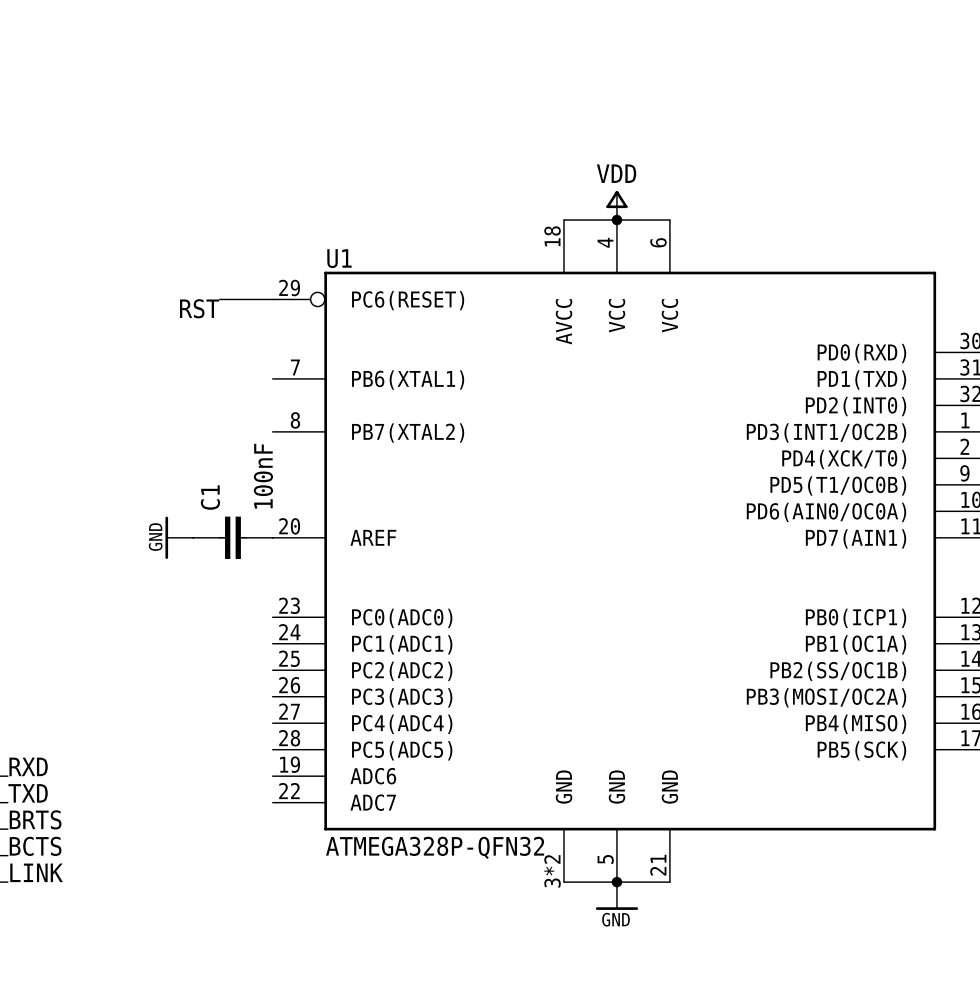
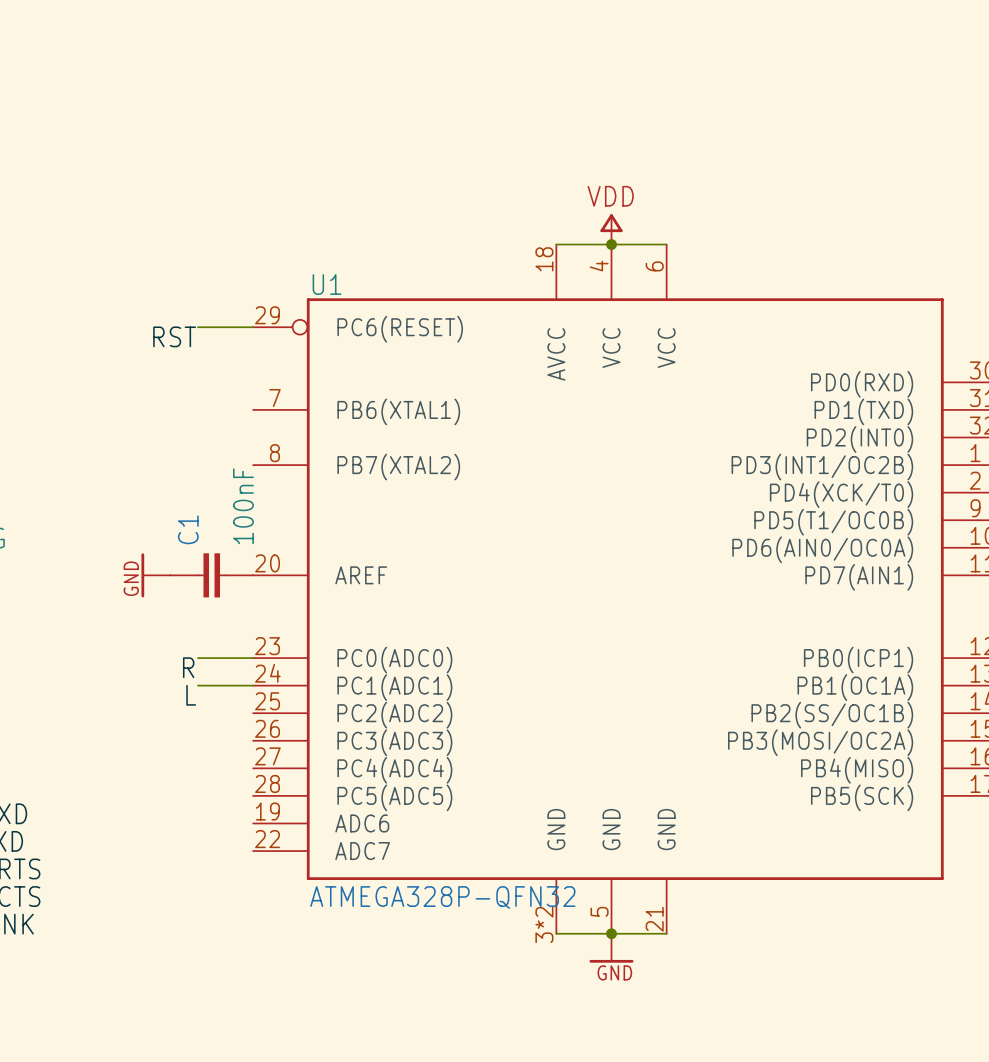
wire: none -> (197, 658) (253, 658)
label: none -> R (188, 667)
wire: none -> (197, 685) (253, 685)
label: none -> L (191, 695)

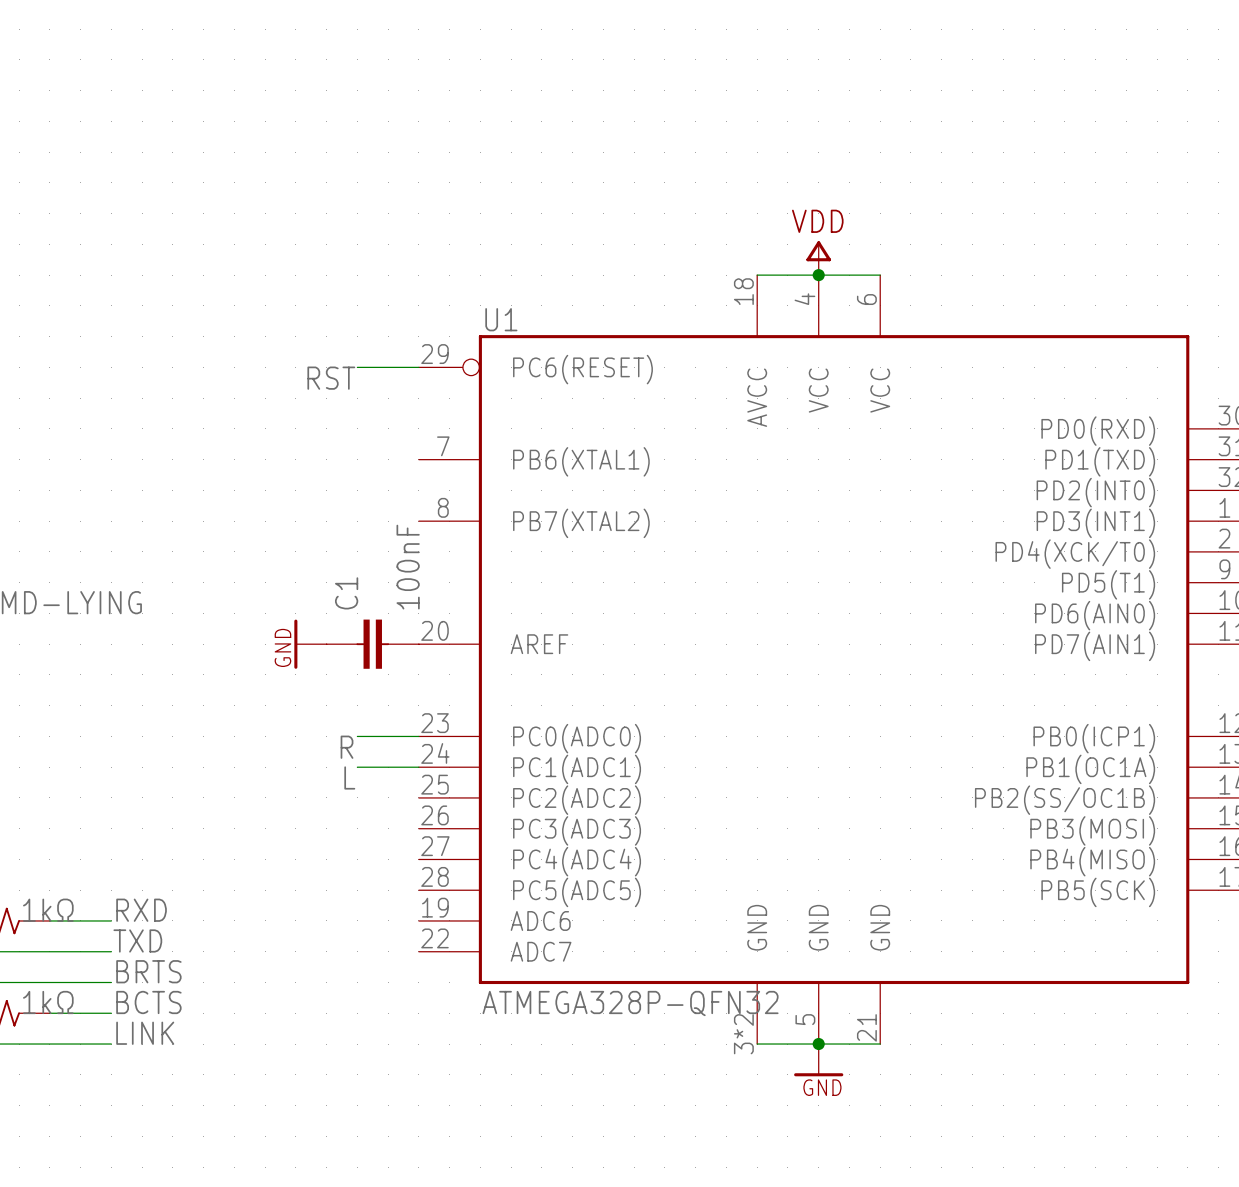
U1 pin name: PD3(INT1/OC2B) (822, 467) -> PD3(INT1) (1095, 523)
U1 pin name: PD5(T1/OC0B) (833, 522) -> PD5(T1) (1108, 584)
U1 pin name: PD6(AIN0/OC0A) (822, 549) -> PD6(AIN0) (1095, 615)
U1 pin name: PB3(MOSI/OC2A) (820, 742) -> PB3(MOSI) (1092, 830)

